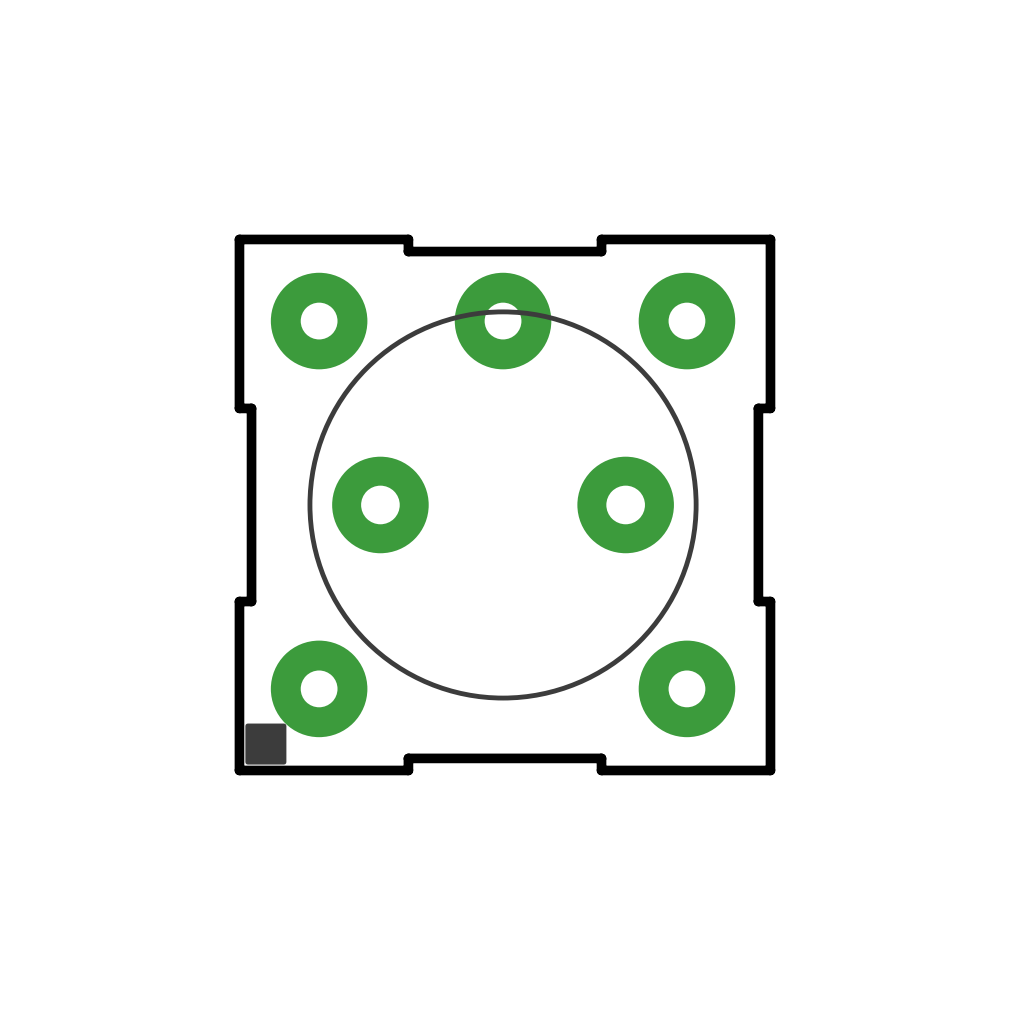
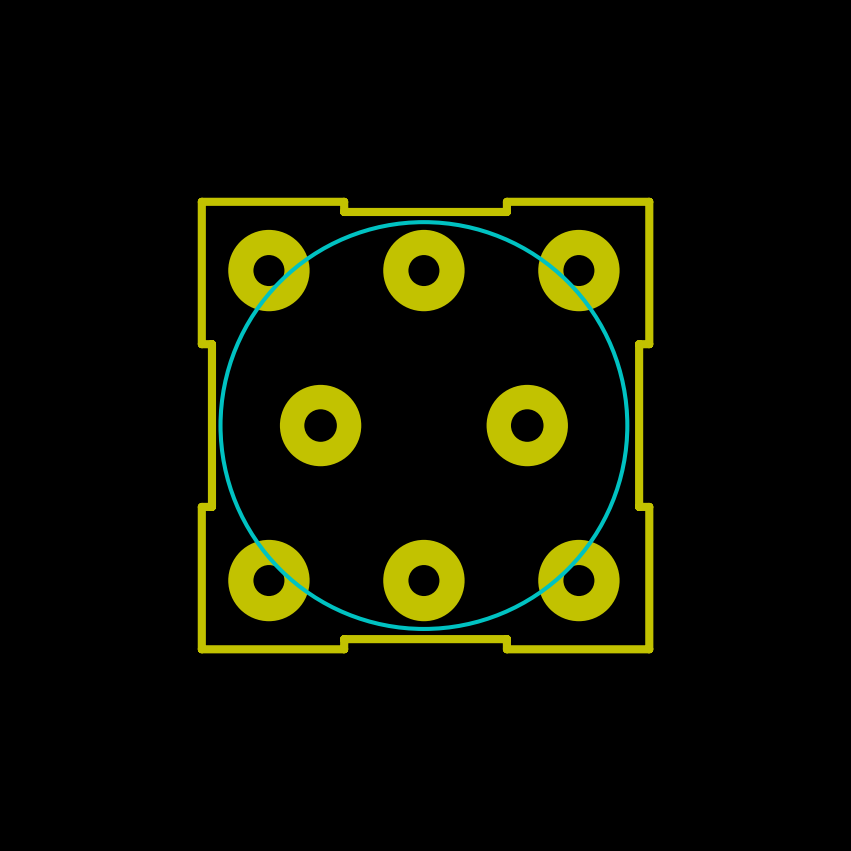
part footprint: [270, 272, 736, 738] -> [218, 220, 630, 631]
drawing: [245, 723, 287, 765] -> none

